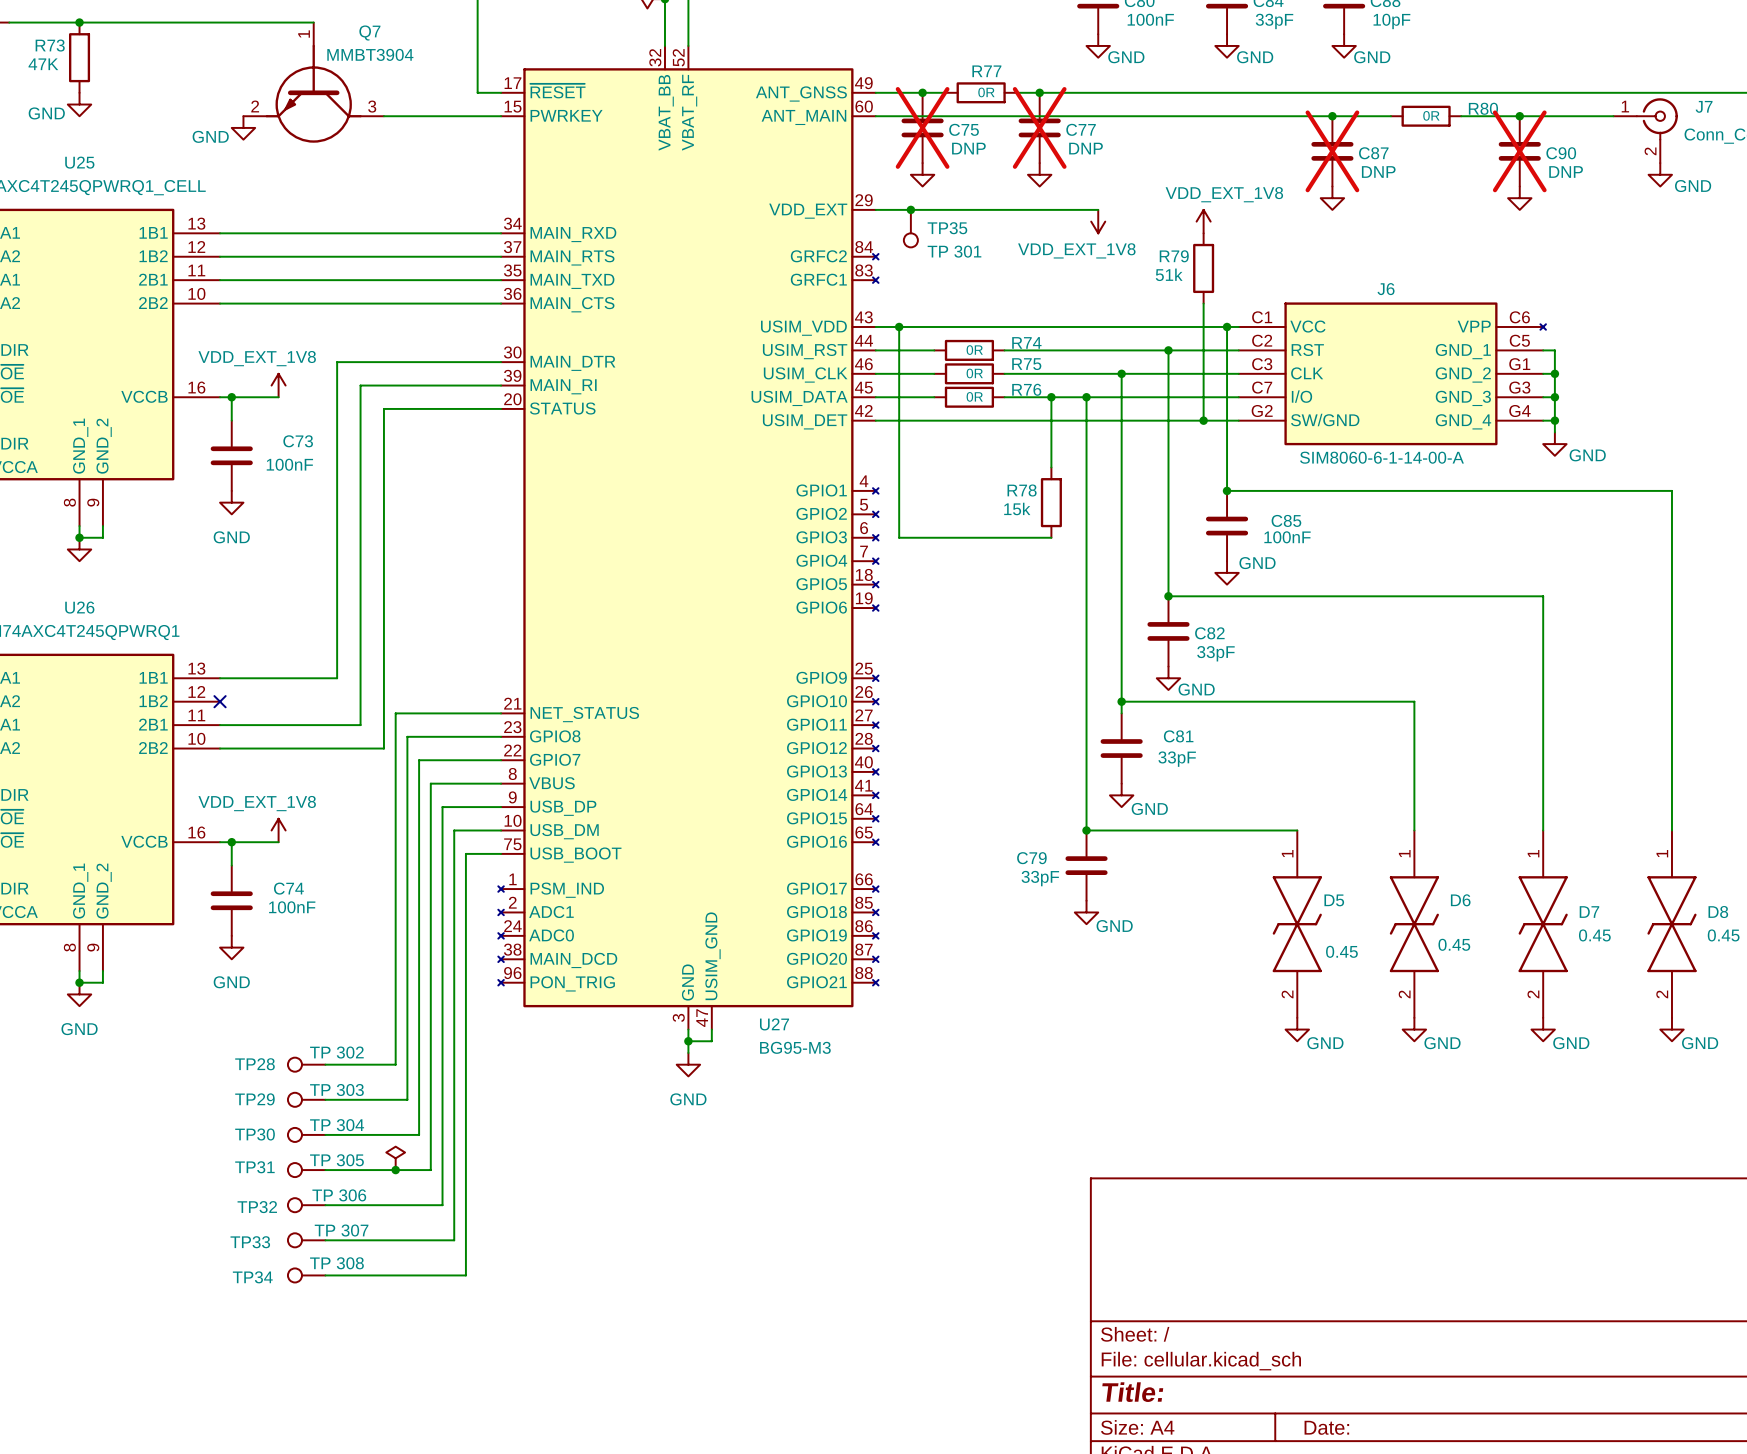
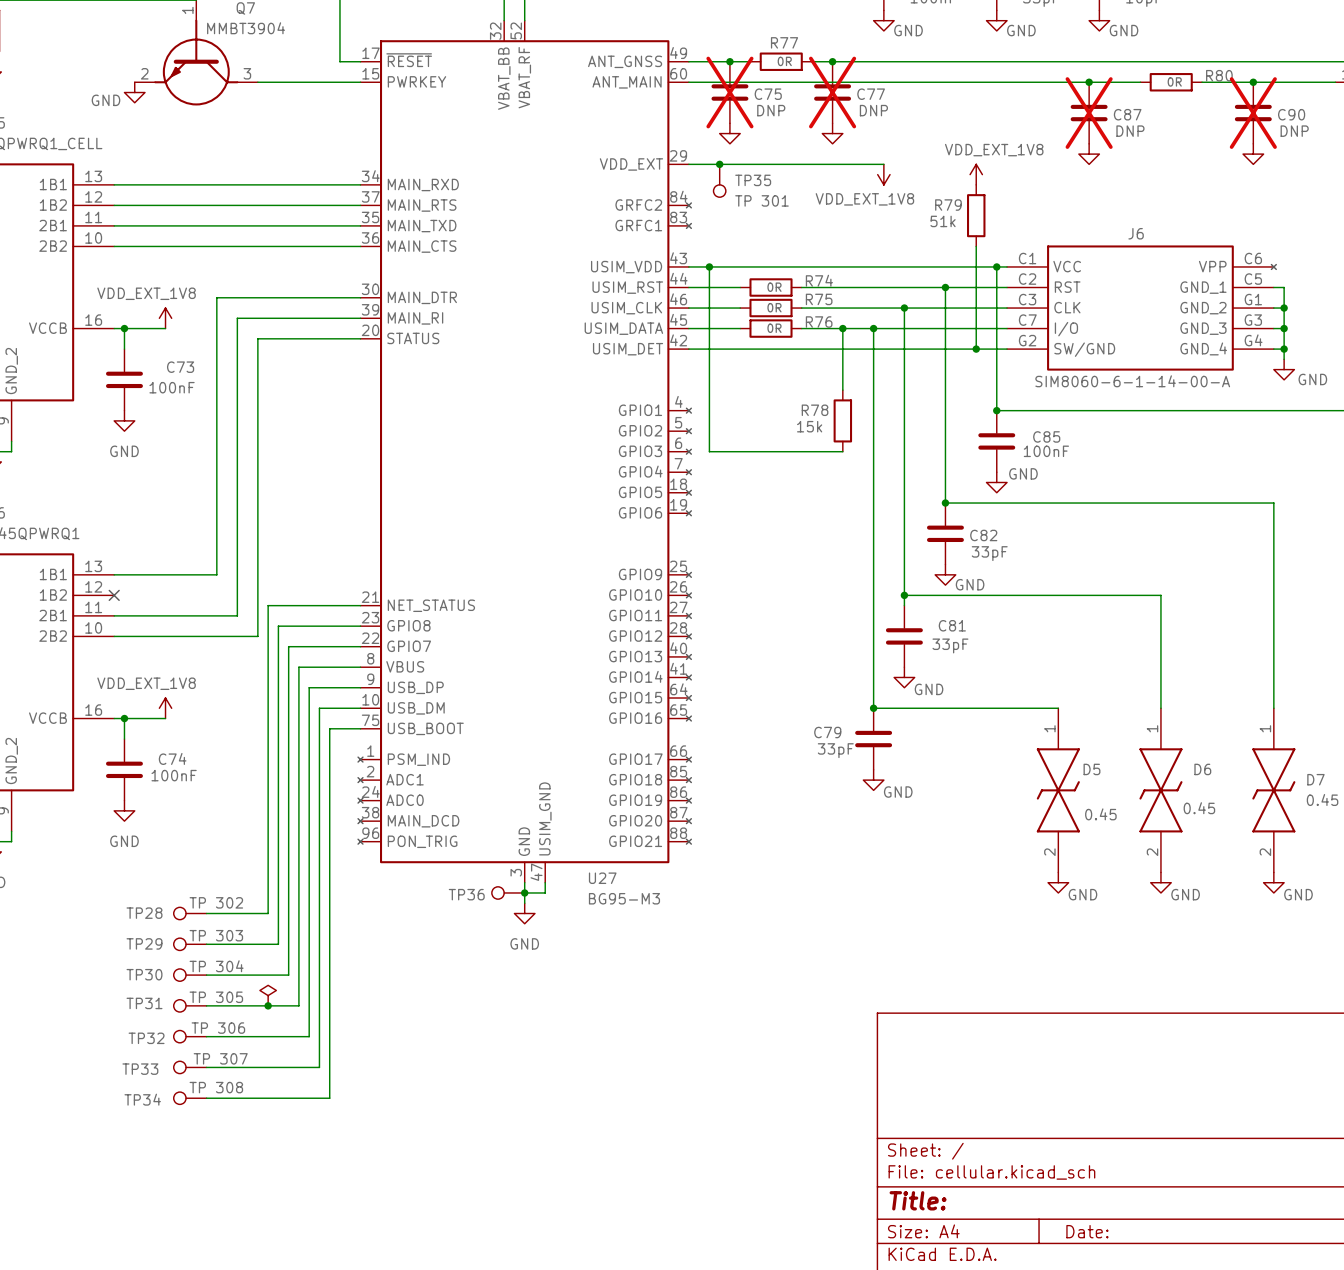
TP36: none -> (508, 892)

